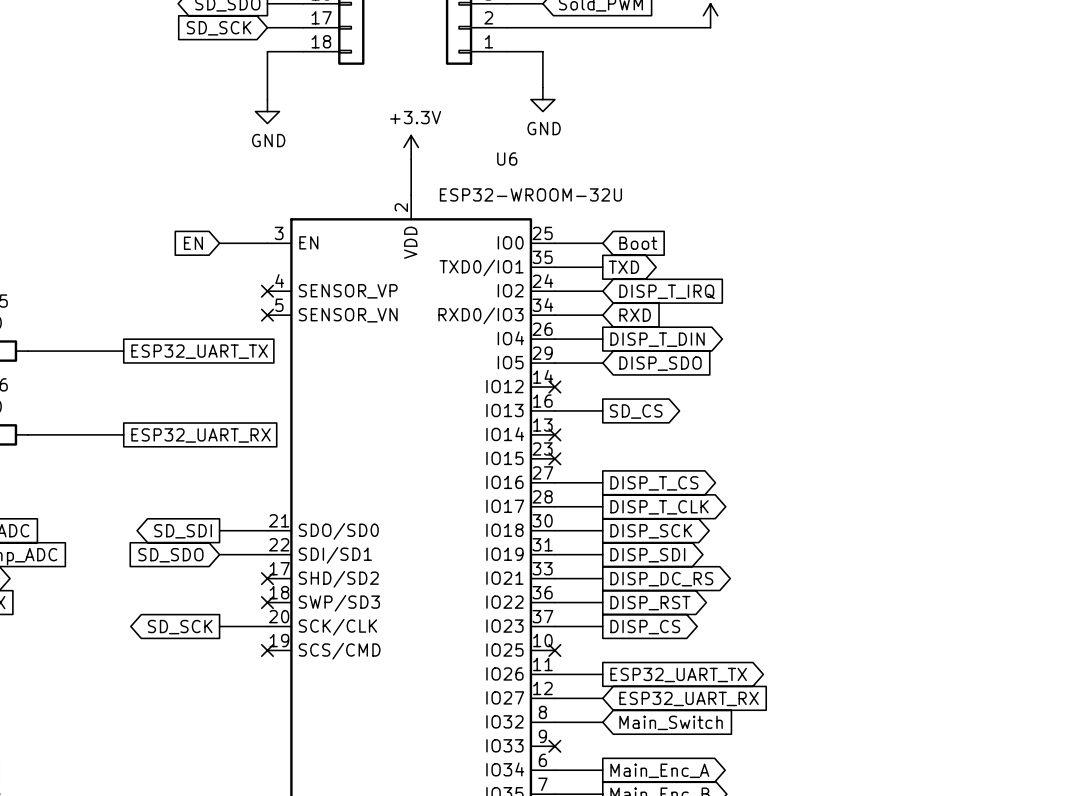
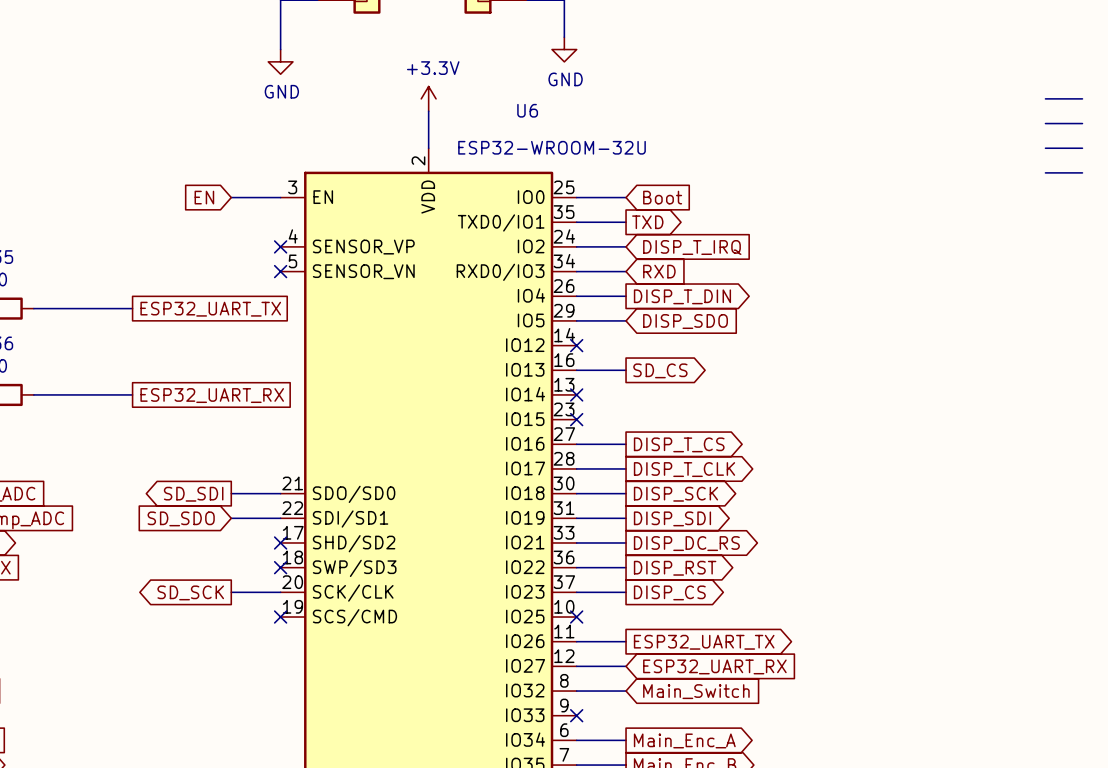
wire: none -> (1045, 98) (1082, 98)
wire: none -> (1045, 123) (1082, 123)
wire: none -> (1045, 148) (1082, 148)
wire: none -> (1045, 172) (1082, 172)

